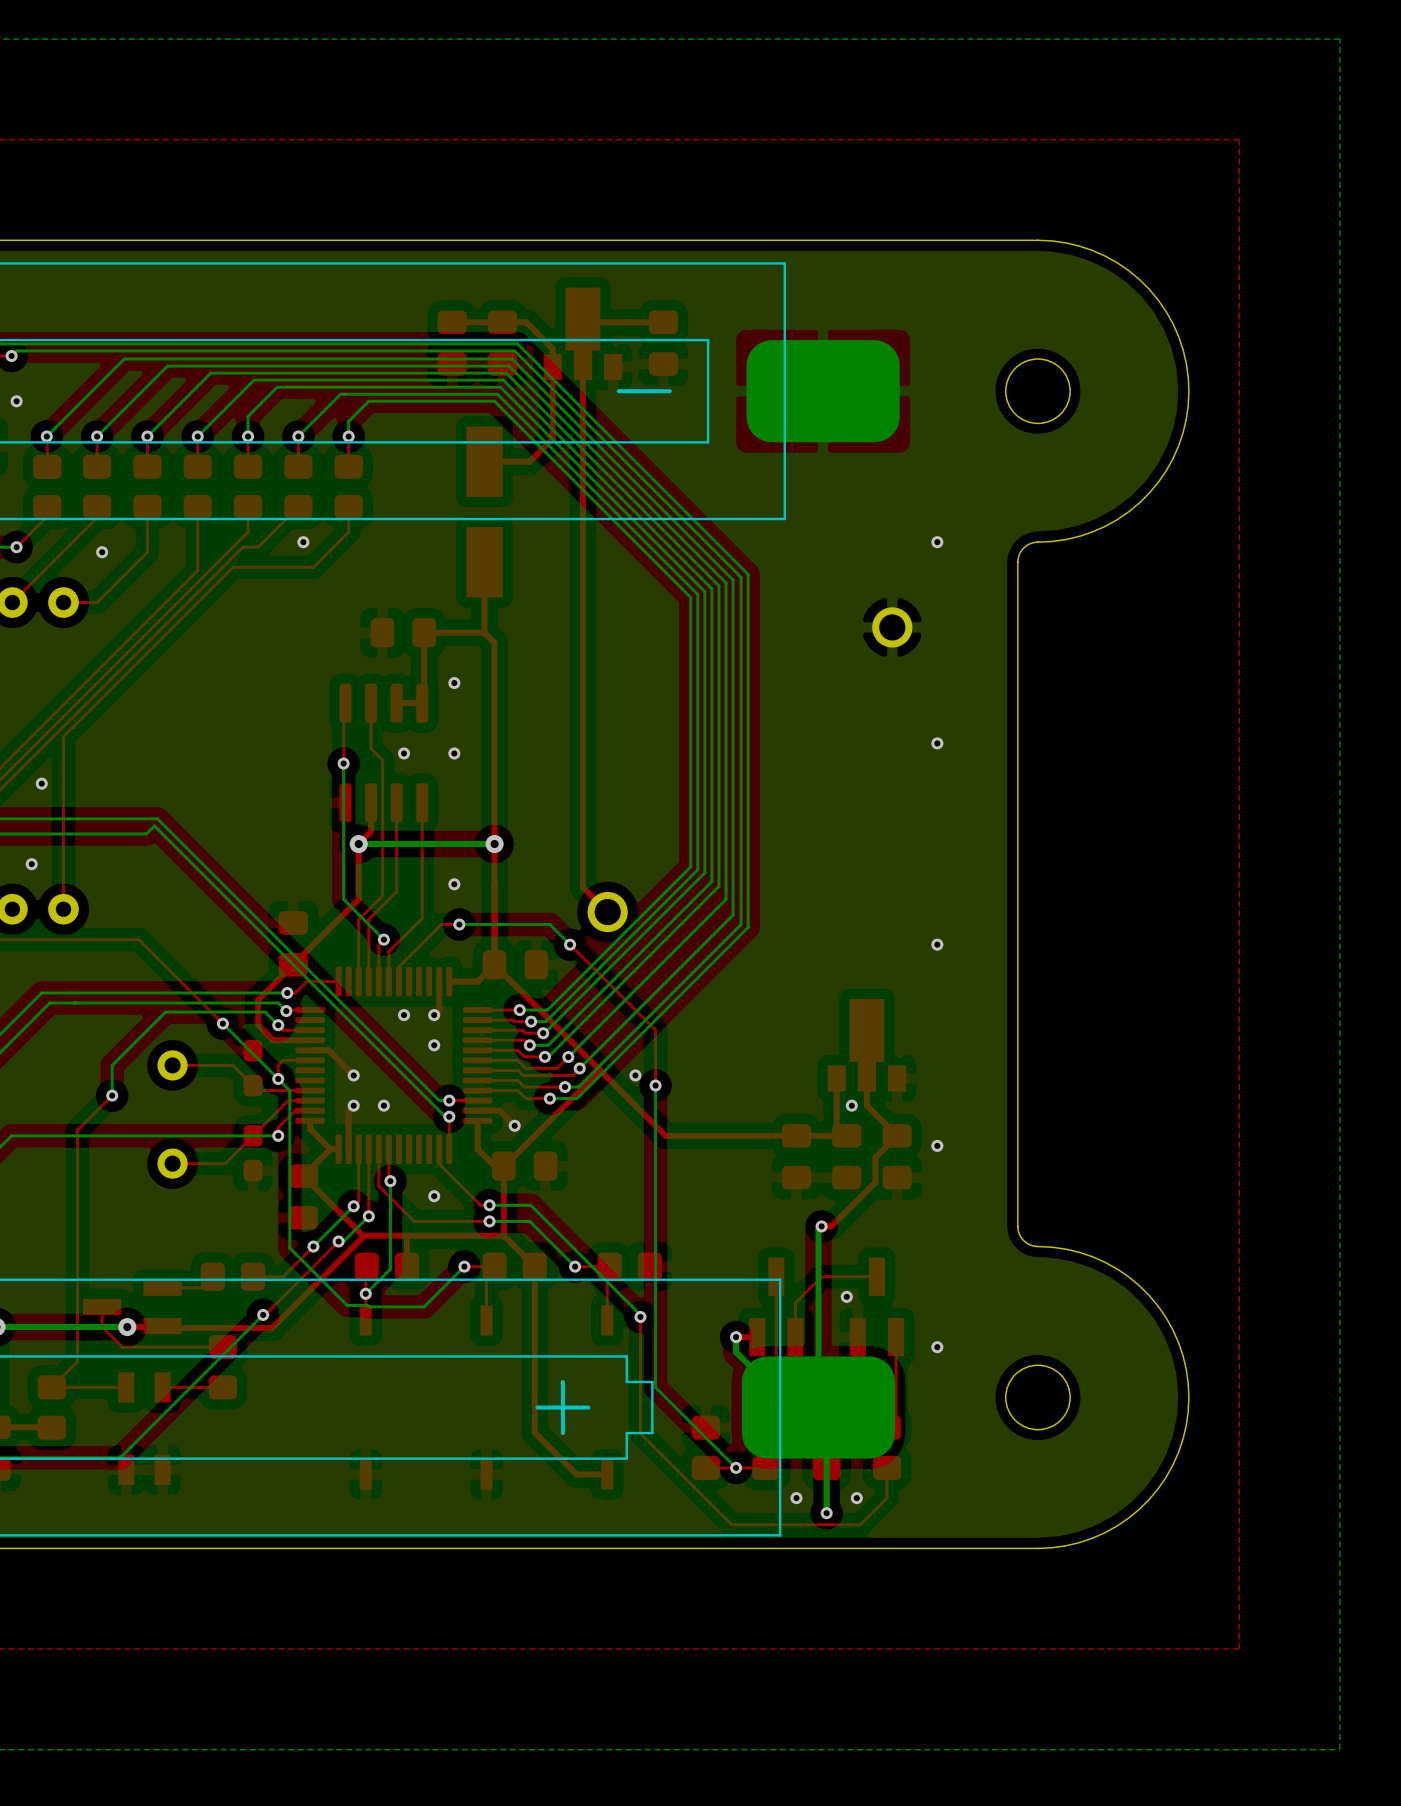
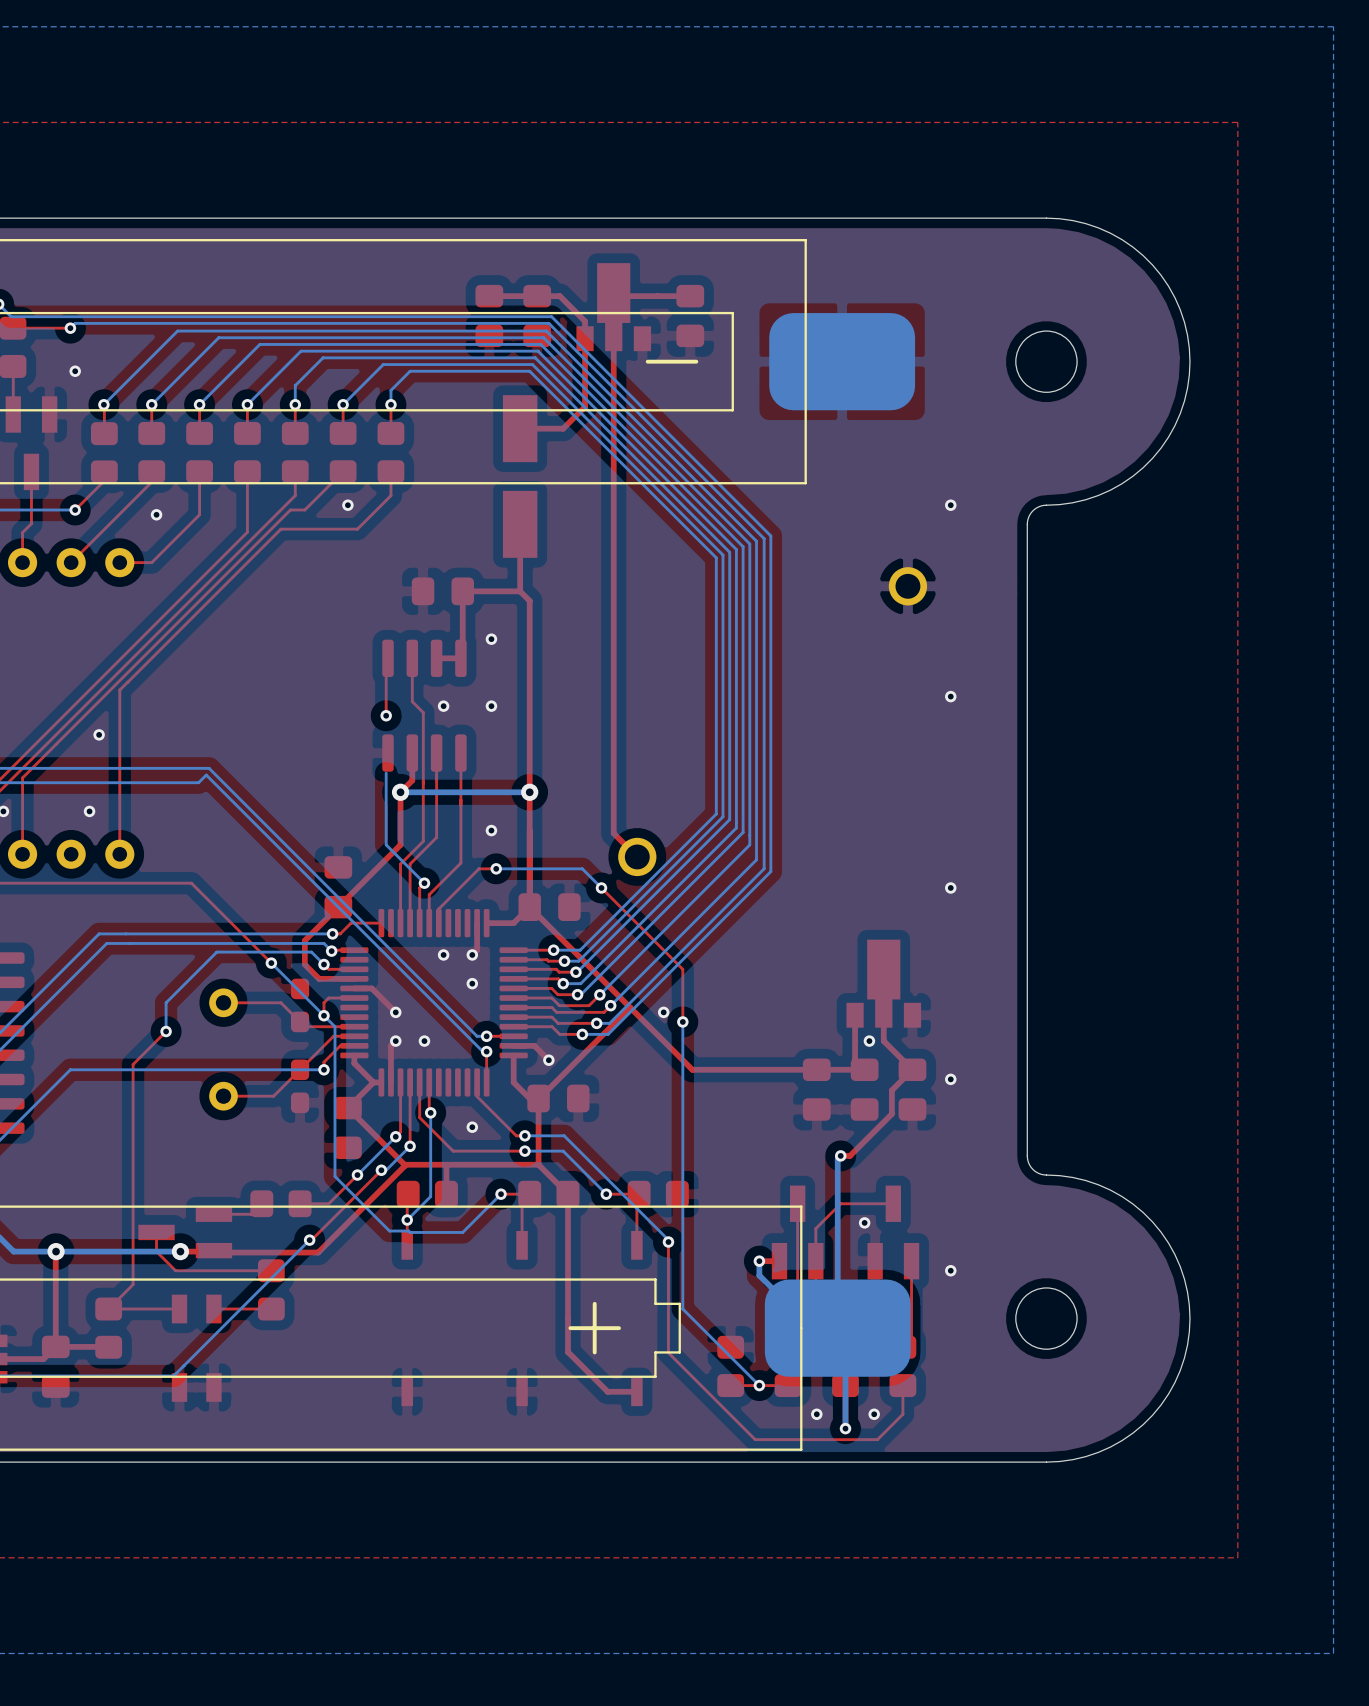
bottom track: (343, 763) (343, 823) -> none

